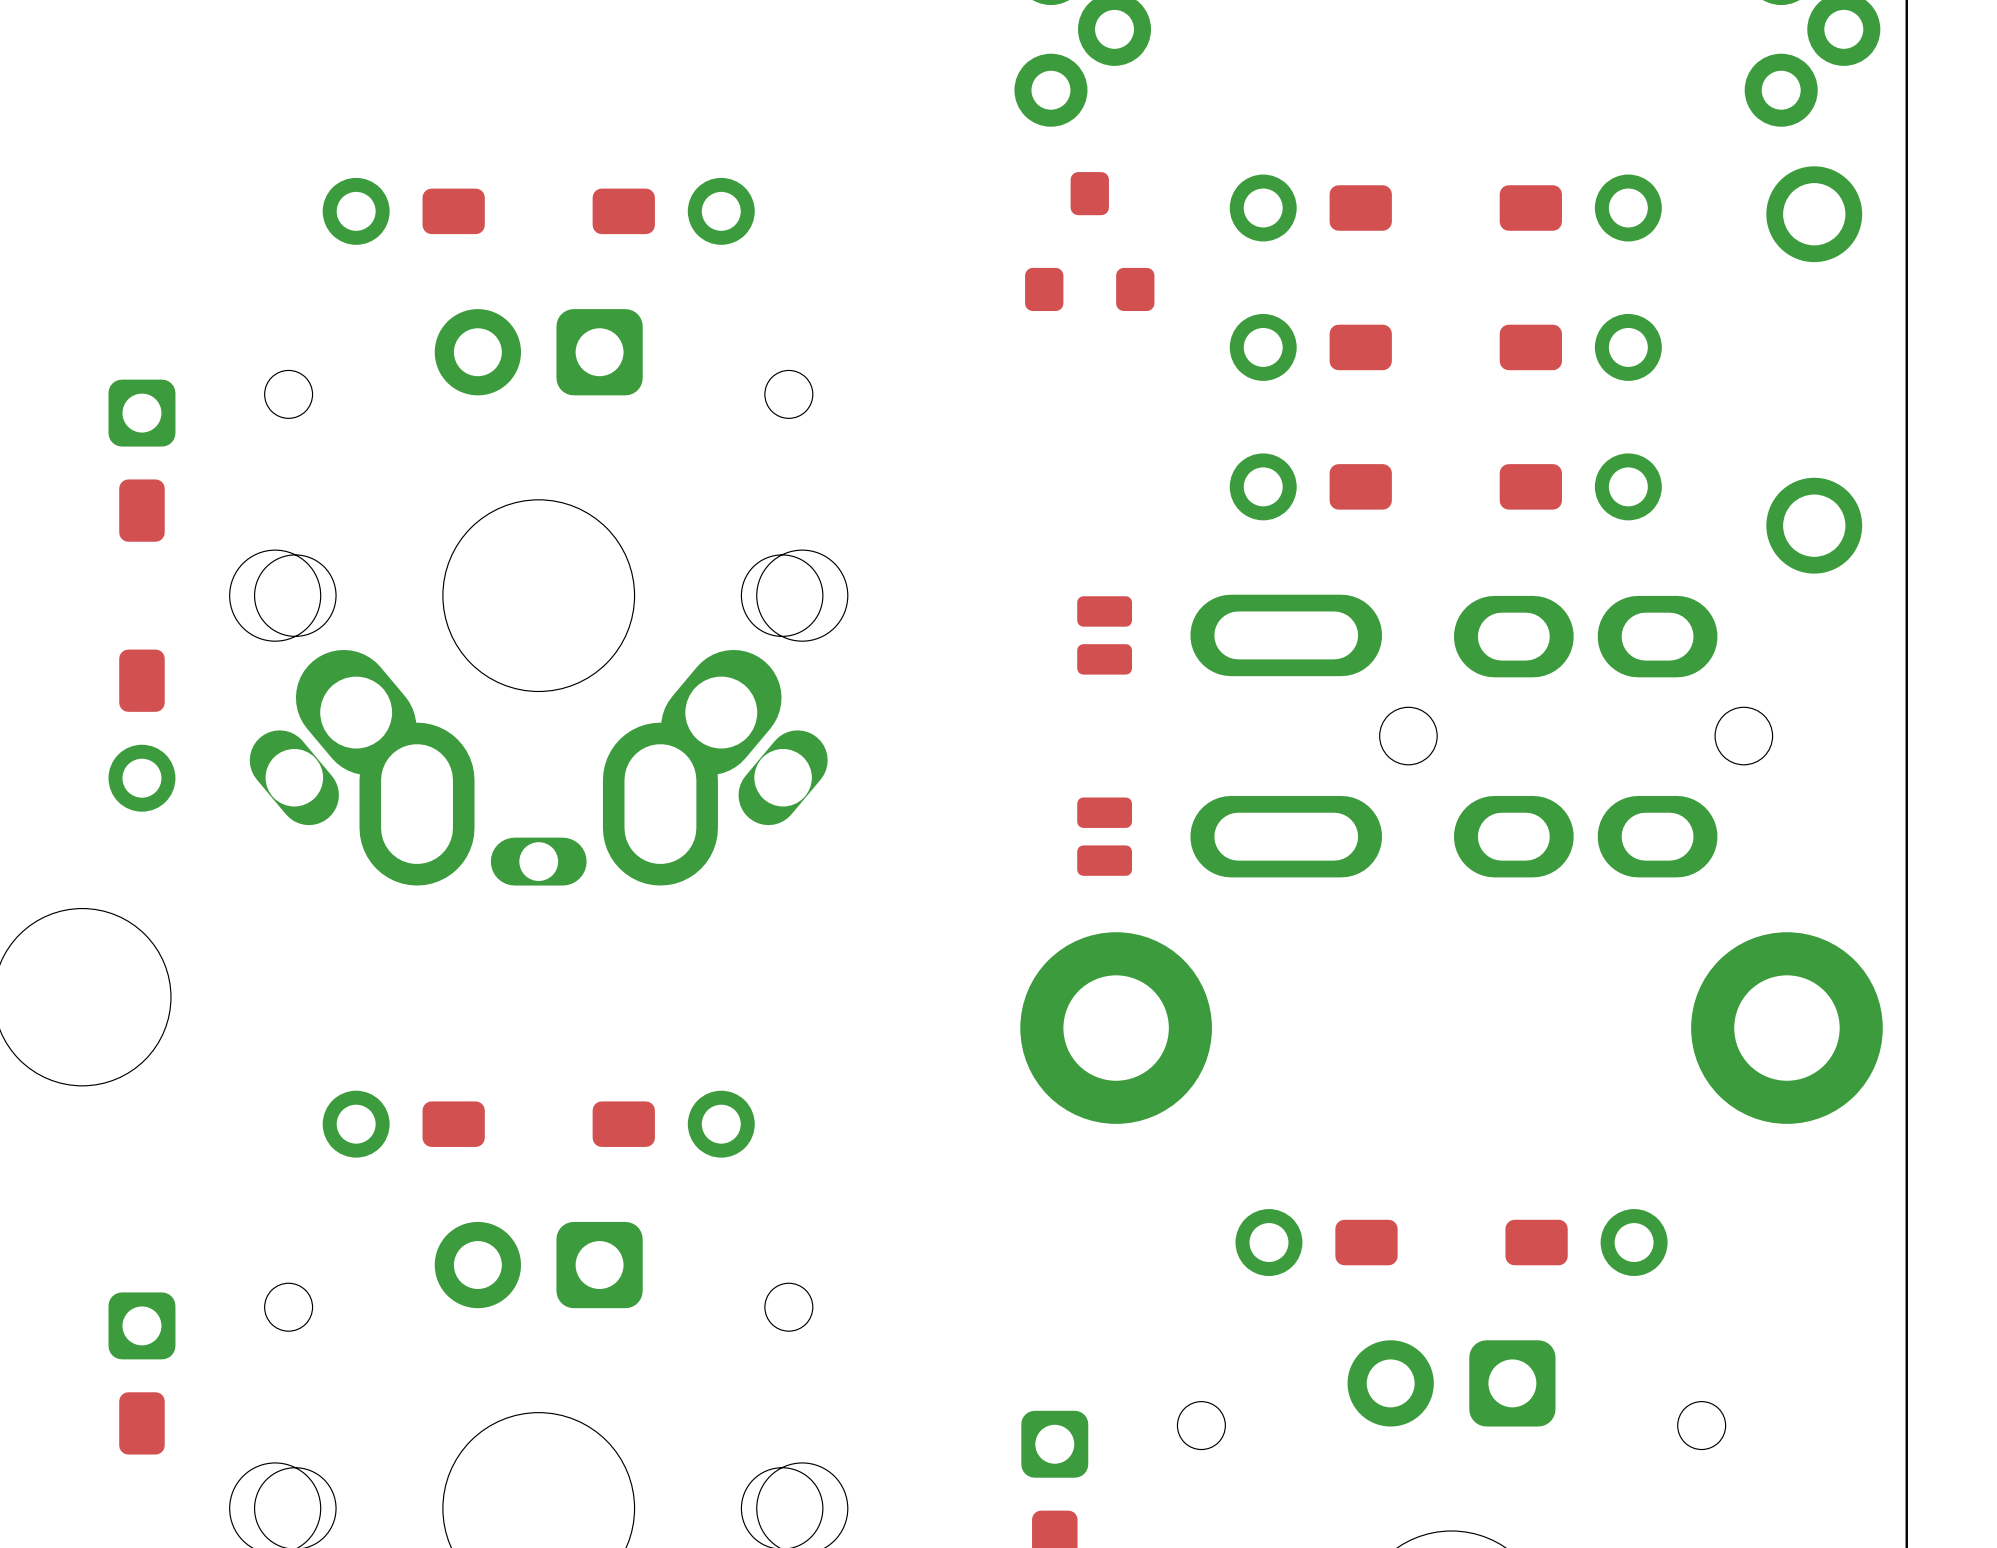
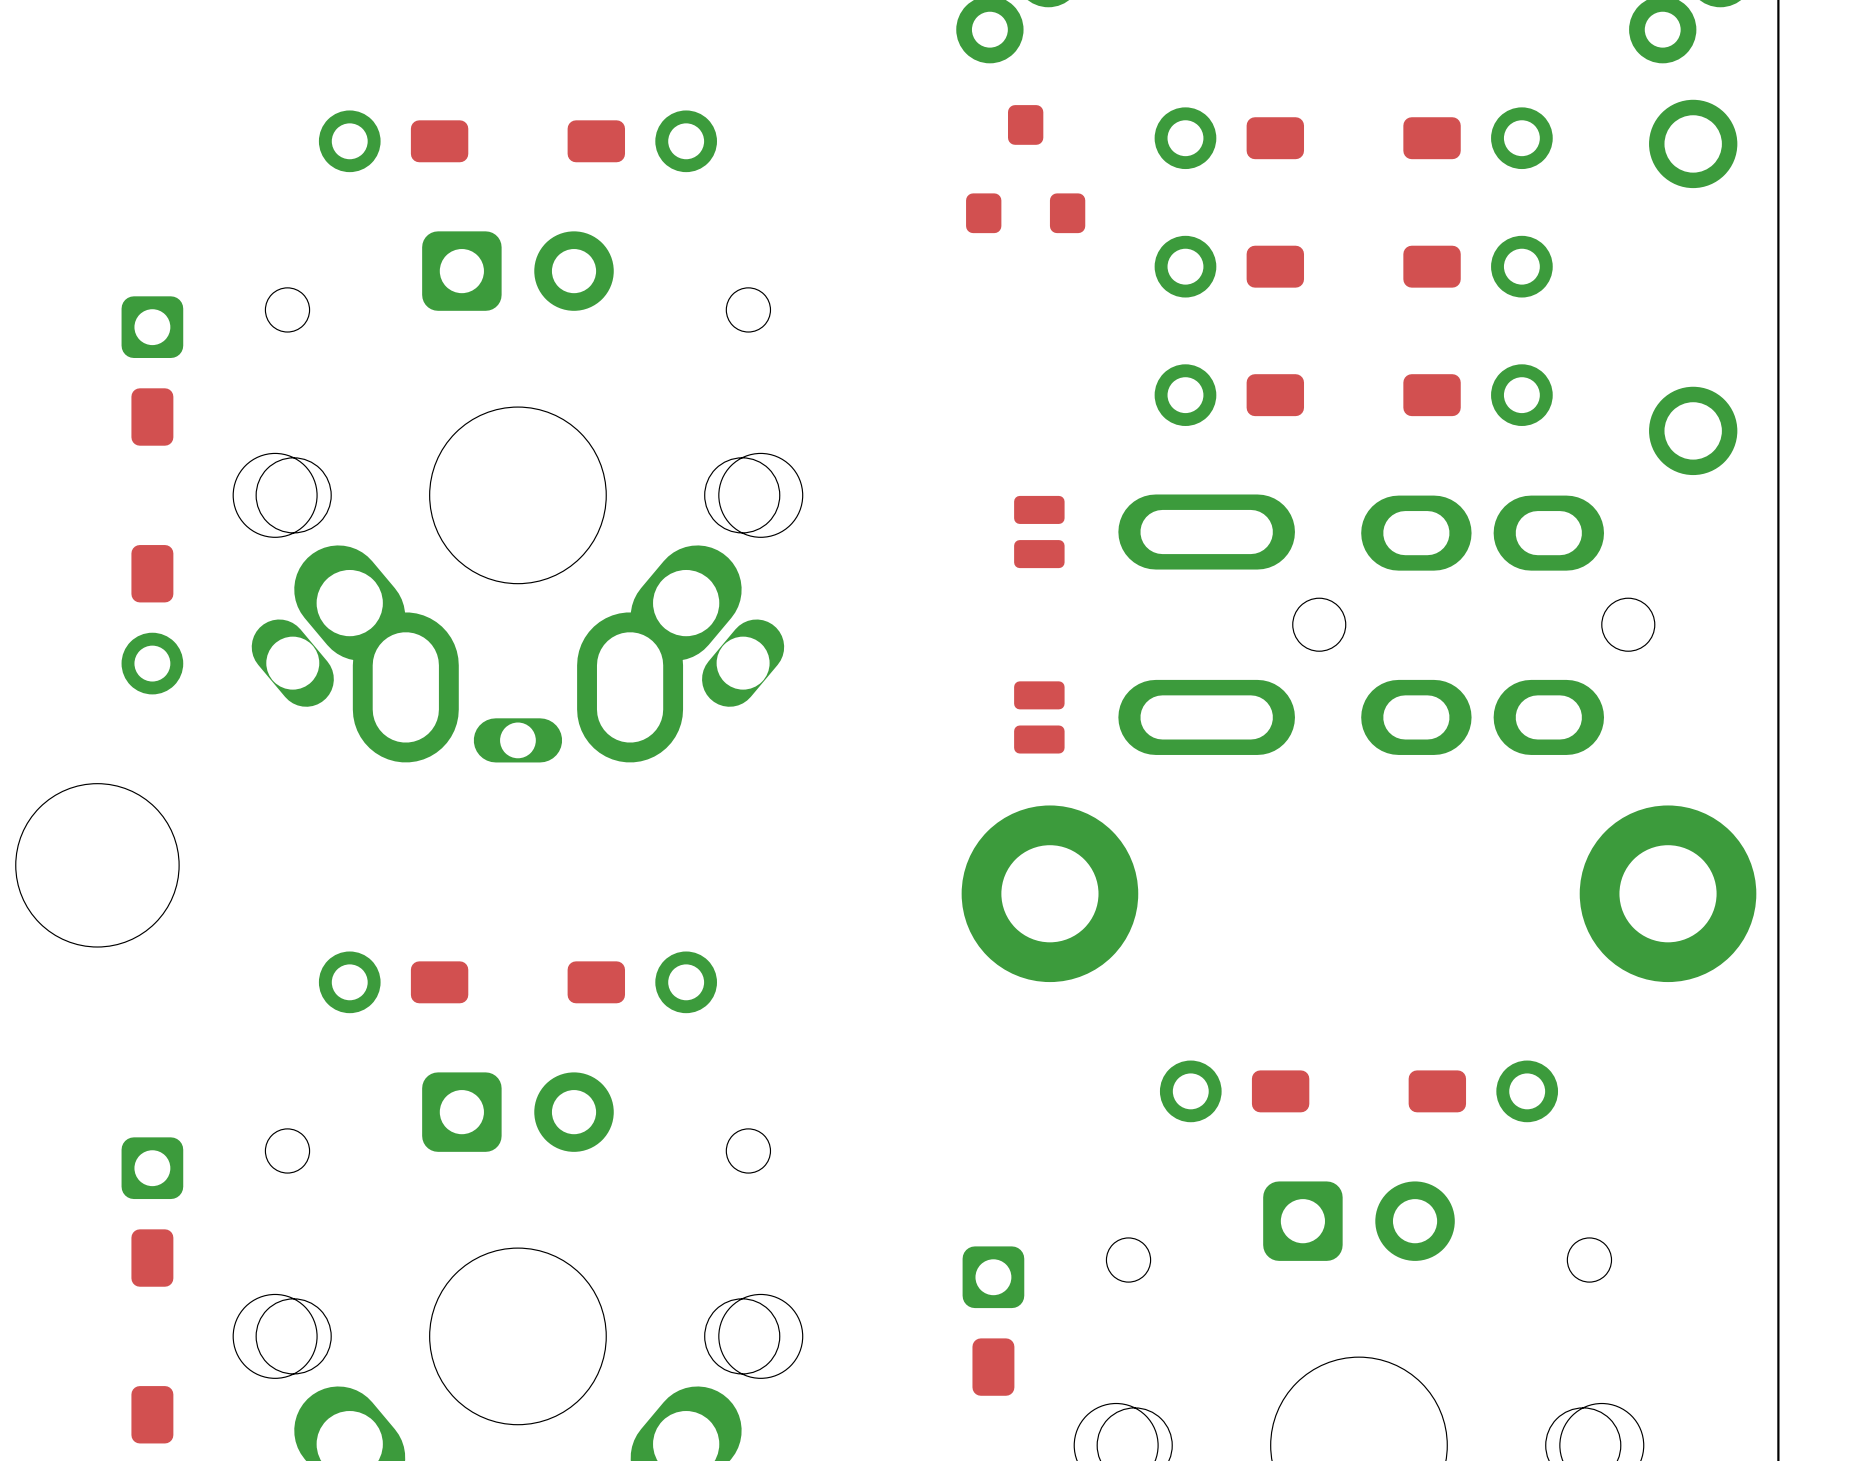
part rotation: 0° (538, 352) -> 180° (517, 271)
part rotation: 0° (538, 1265) -> 180° (517, 1112)
part rotation: 0° (1451, 1383) -> 180° (1358, 1221)

